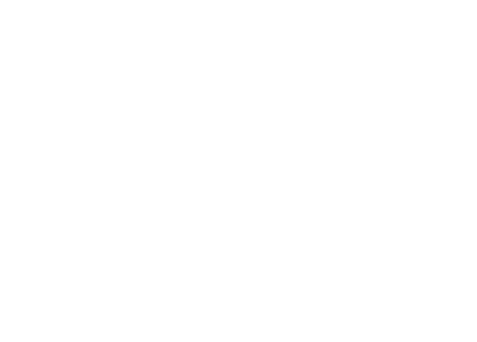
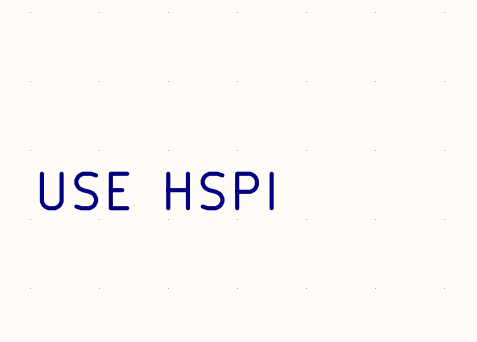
text: none -> USE HSPI (156, 190)

